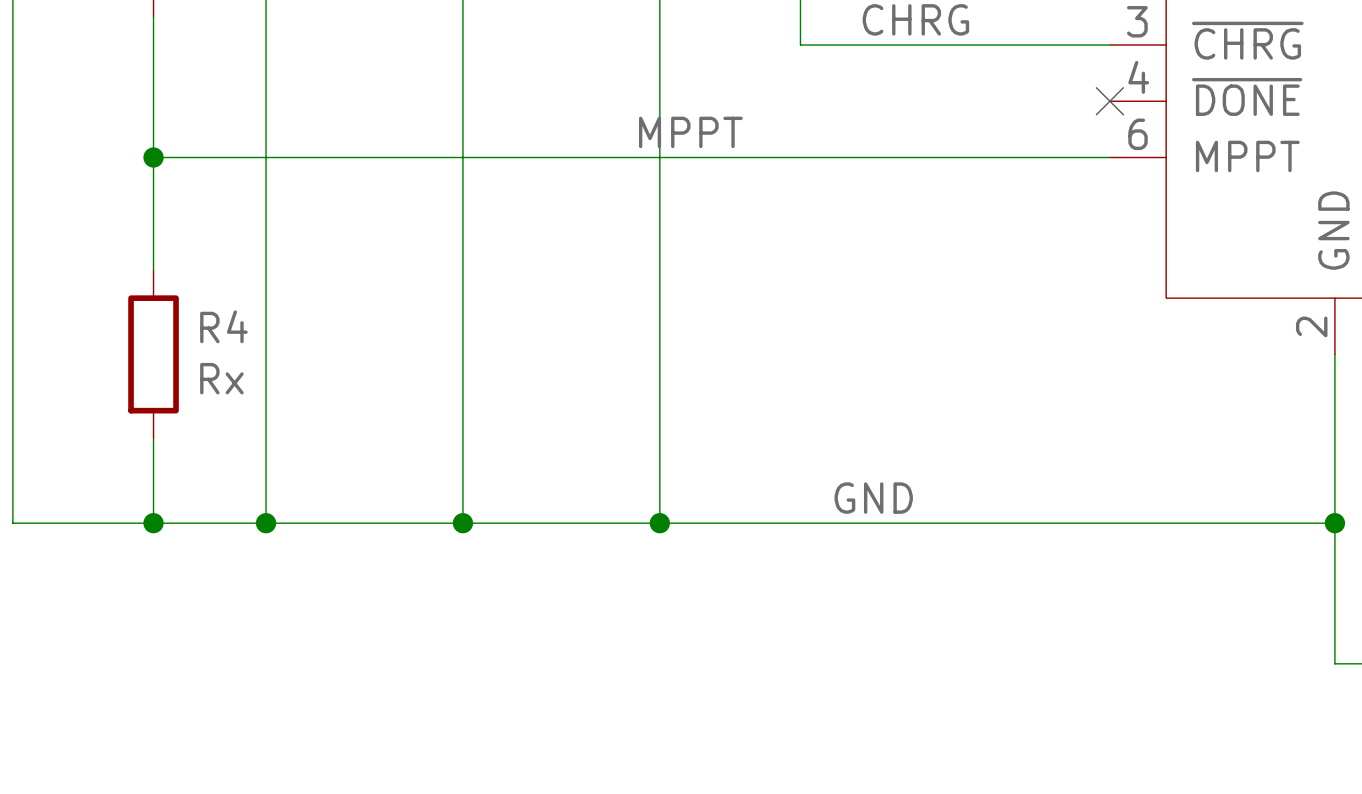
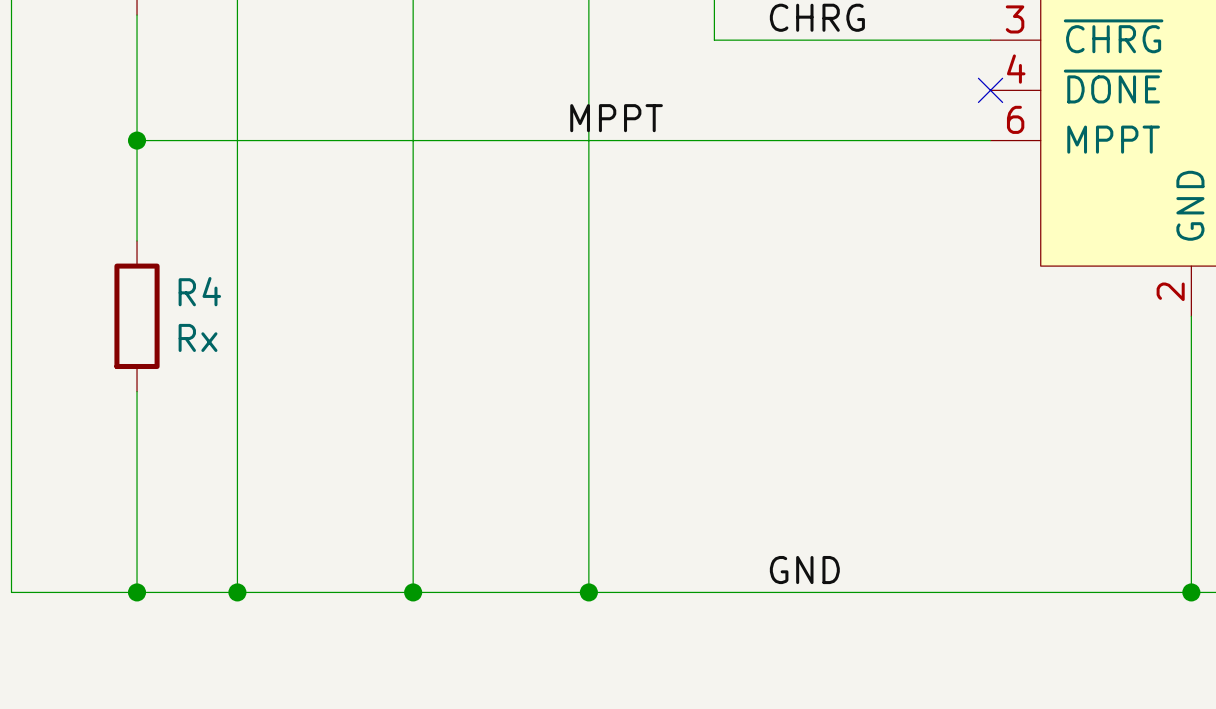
label position: GND (873, 498) -> GND (804, 570)
wire: (12, 523) (1334, 523) -> (11, 466) (11, 592) (1191, 592)
wire: none -> (137, 466) (137, 592)
junction: (153, 523) -> none
wire: none -> (237, 466) (237, 592)
junction: (266, 523) -> none
wire: none -> (413, 466) (413, 592)
junction: (462, 523) -> none
wire: none -> (588, 466) (588, 592)
junction: (659, 523) -> none
junction: (1334, 523) -> none
junction: none -> (137, 592)
junction: none -> (237, 592)
junction: none -> (413, 592)
junction: none -> (588, 592)
junction: none -> (1191, 592)

